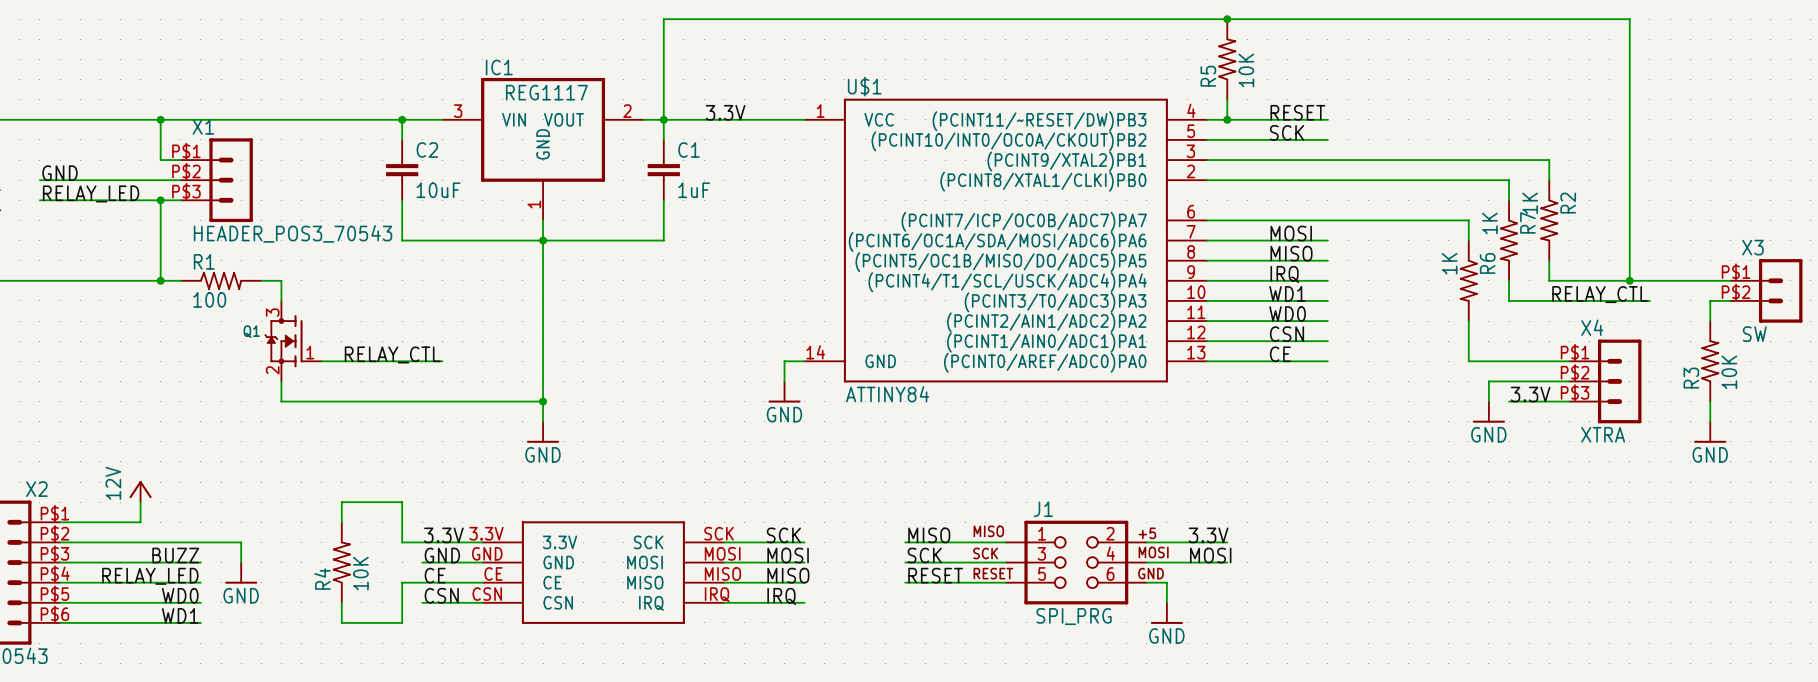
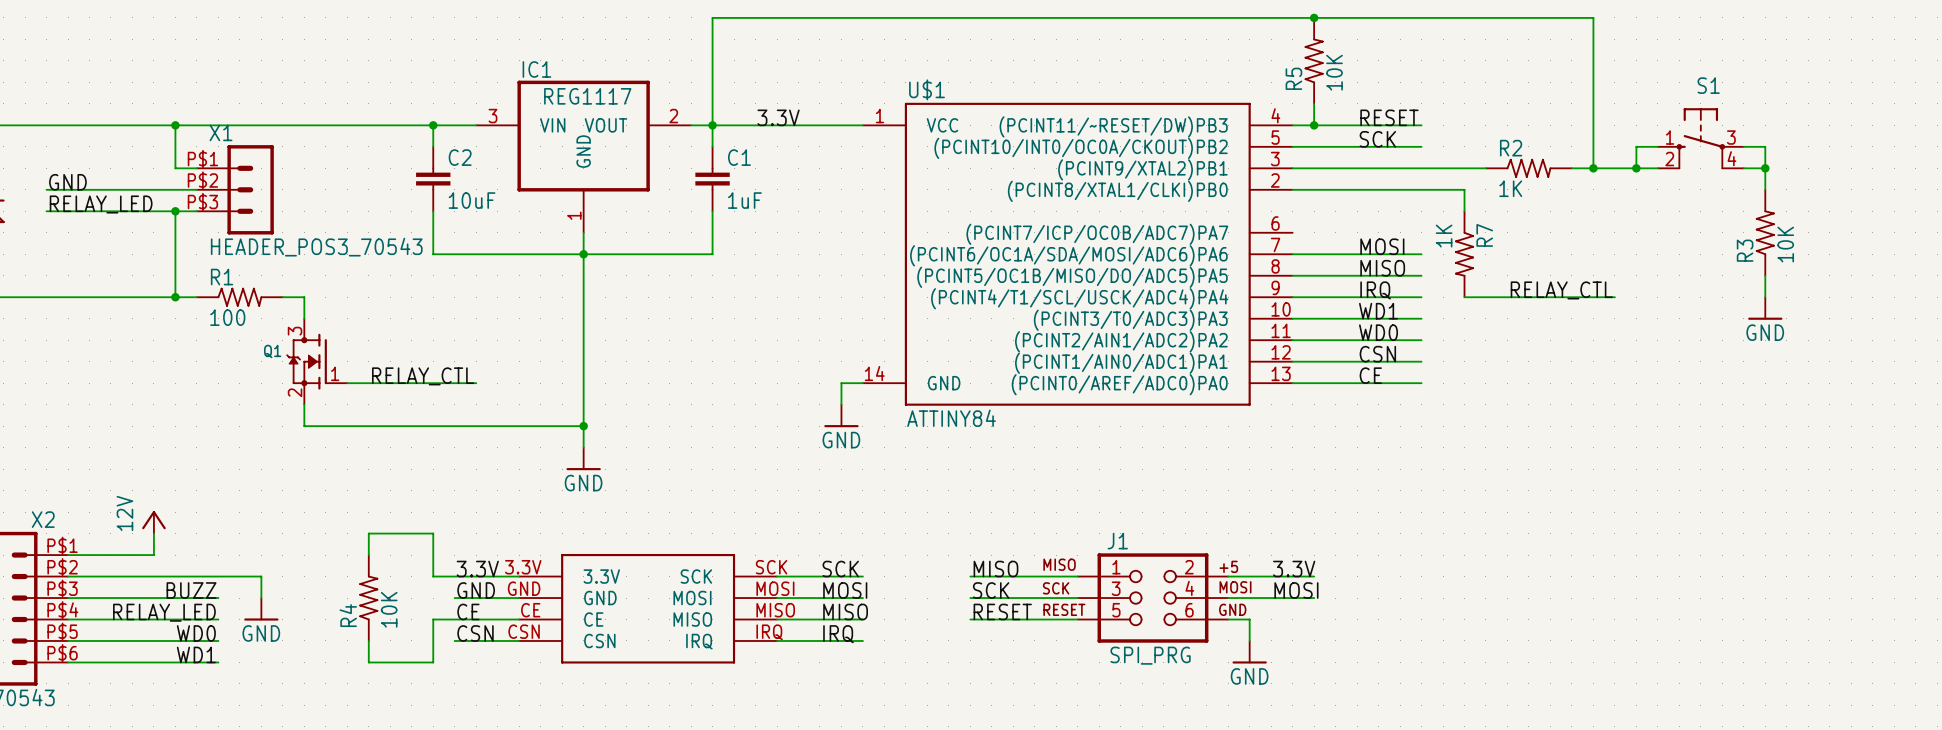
wire: (1488, 19) (1629, 19) (1629, 280) -> (1593, 17) (1593, 168)
S1: none -> (1700, 138)
wire: none -> (1657, 146) (1636, 146) (1636, 168)
wire: none -> (1743, 146) (1765, 146) (1765, 189)
junction: none -> (1593, 168)
junction: none -> (1636, 168)
wire: (1549, 160) (1549, 180) -> (1765, 275) (1765, 297)
wire: none -> (1743, 168) (1765, 168)
junction: none -> (1765, 168)
wire: (1368, 180) (1509, 180) (1509, 200) -> (1464, 189) (1464, 211)
wire: (1207, 220) (1468, 220) (1468, 240) -> none
R2 rotation: 0° (1549, 220) -> 90° counterclockwise (1528, 168)
R2 position: (1549, 220) -> (1528, 168)
R7 position: (1509, 240) -> (1464, 254)
wire: (1549, 260) (1549, 280) (1730, 280) -> none
R6: 1K (1468, 280) -> none
wire: (1509, 280) (1509, 300) (1649, 300) -> (1614, 297) (1464, 297)
junction: (1629, 280) -> none
X3: SW (1766, 290) -> none
power symbol: none -> GND (1765, 308)
label position: RELAY_CTL (1600, 294) -> RELAY_CTL (1561, 290)
wire: (1730, 300) (1710, 300) (1710, 321) -> none
wire: (1468, 321) (1468, 361) (1569, 361) -> none
R3 position: (1710, 361) -> (1765, 232)
wire: (1569, 381) (1488, 381) (1488, 401) -> none
X4: XTRA (1605, 381) -> none
label: 3.3V (1530, 394) -> none
wire: (1509, 401) (1569, 401) -> none
wire: (1710, 401) (1710, 421) -> none
power symbol: GND (1488, 412) -> none
power symbol: GND (1710, 432) -> none

